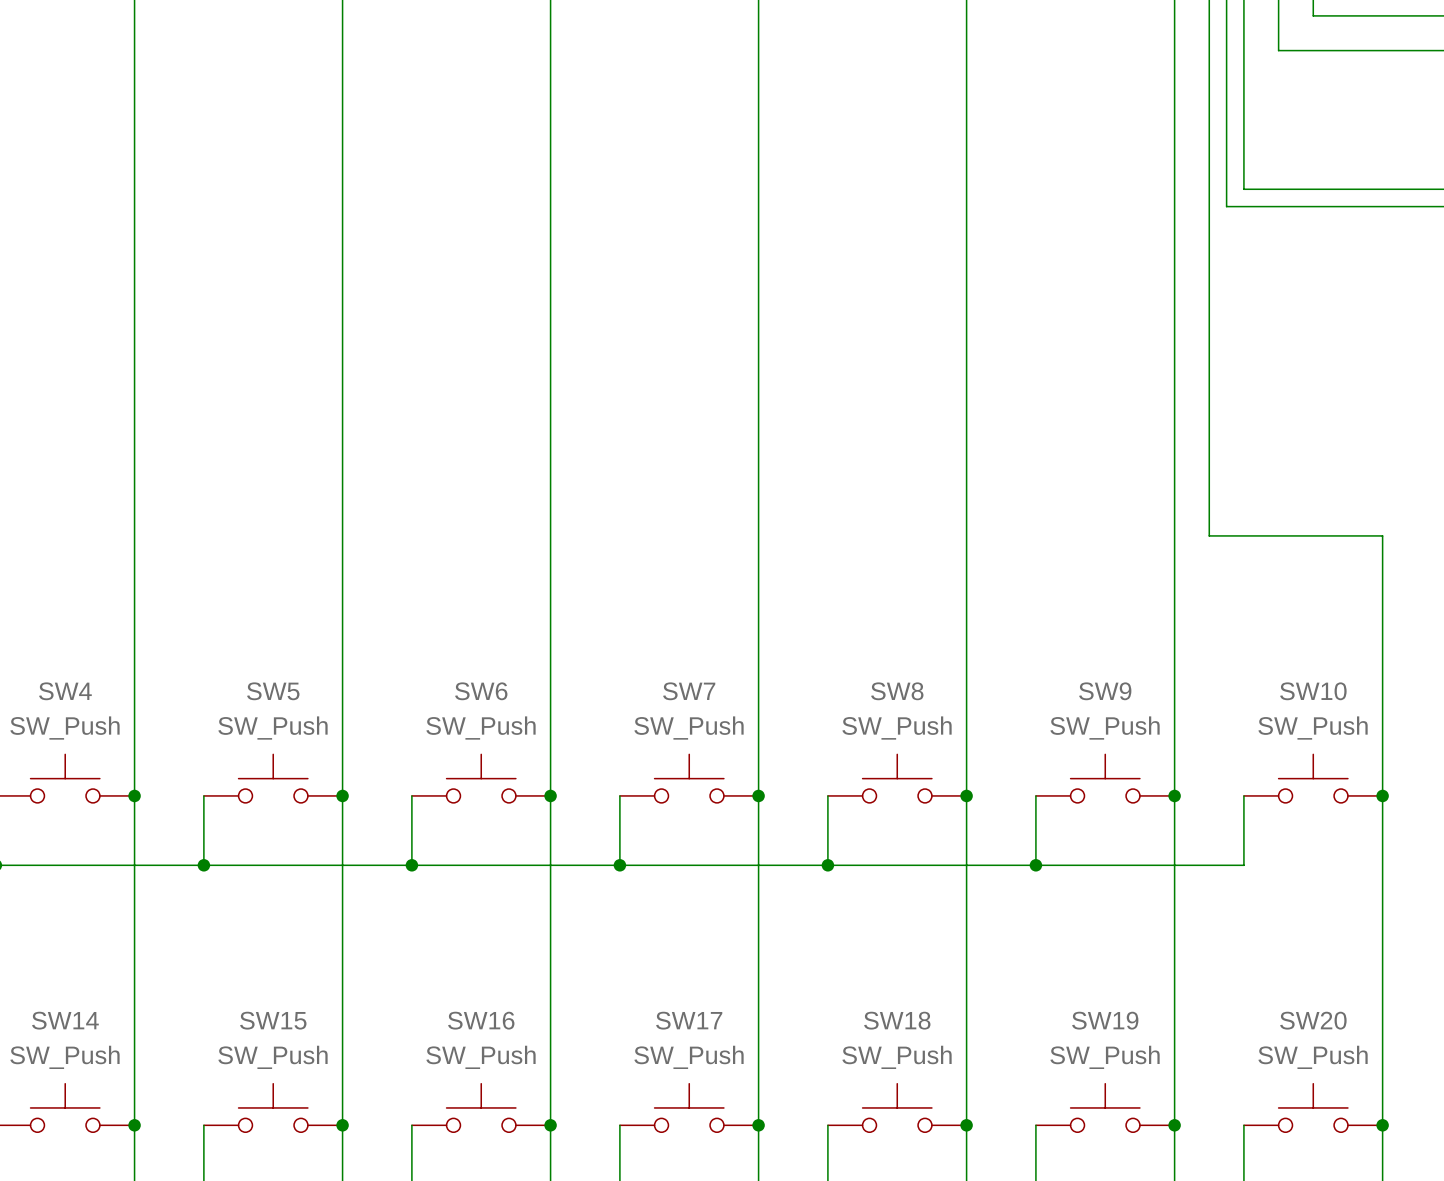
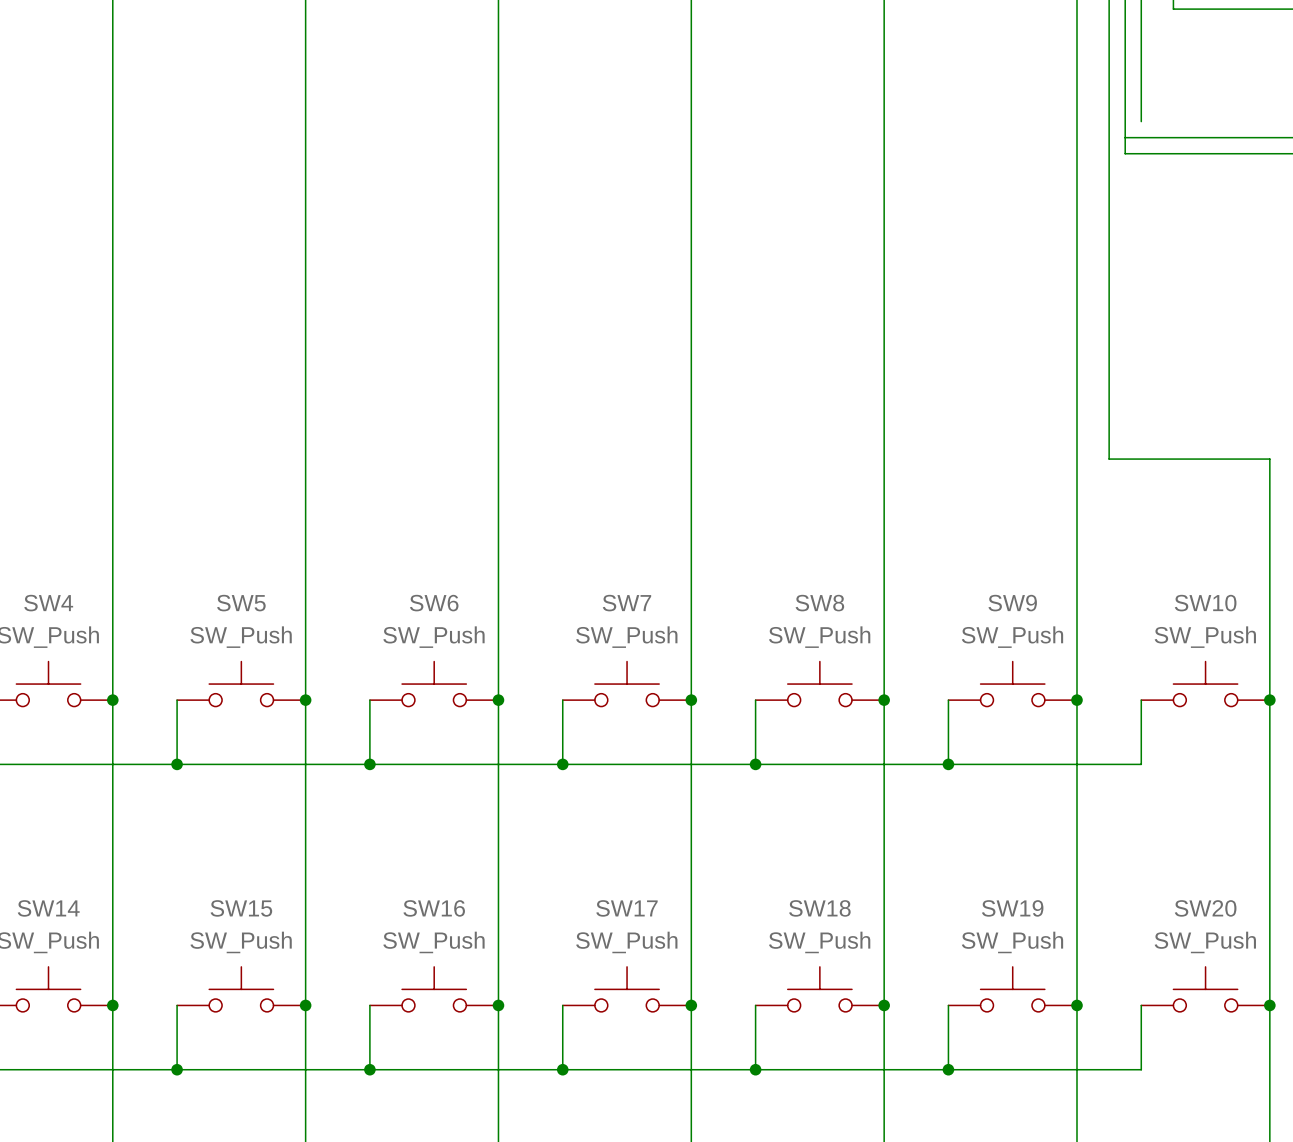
wire: (1243, 171) (1243, 189) -> (1125, 137) (1141, 137)

